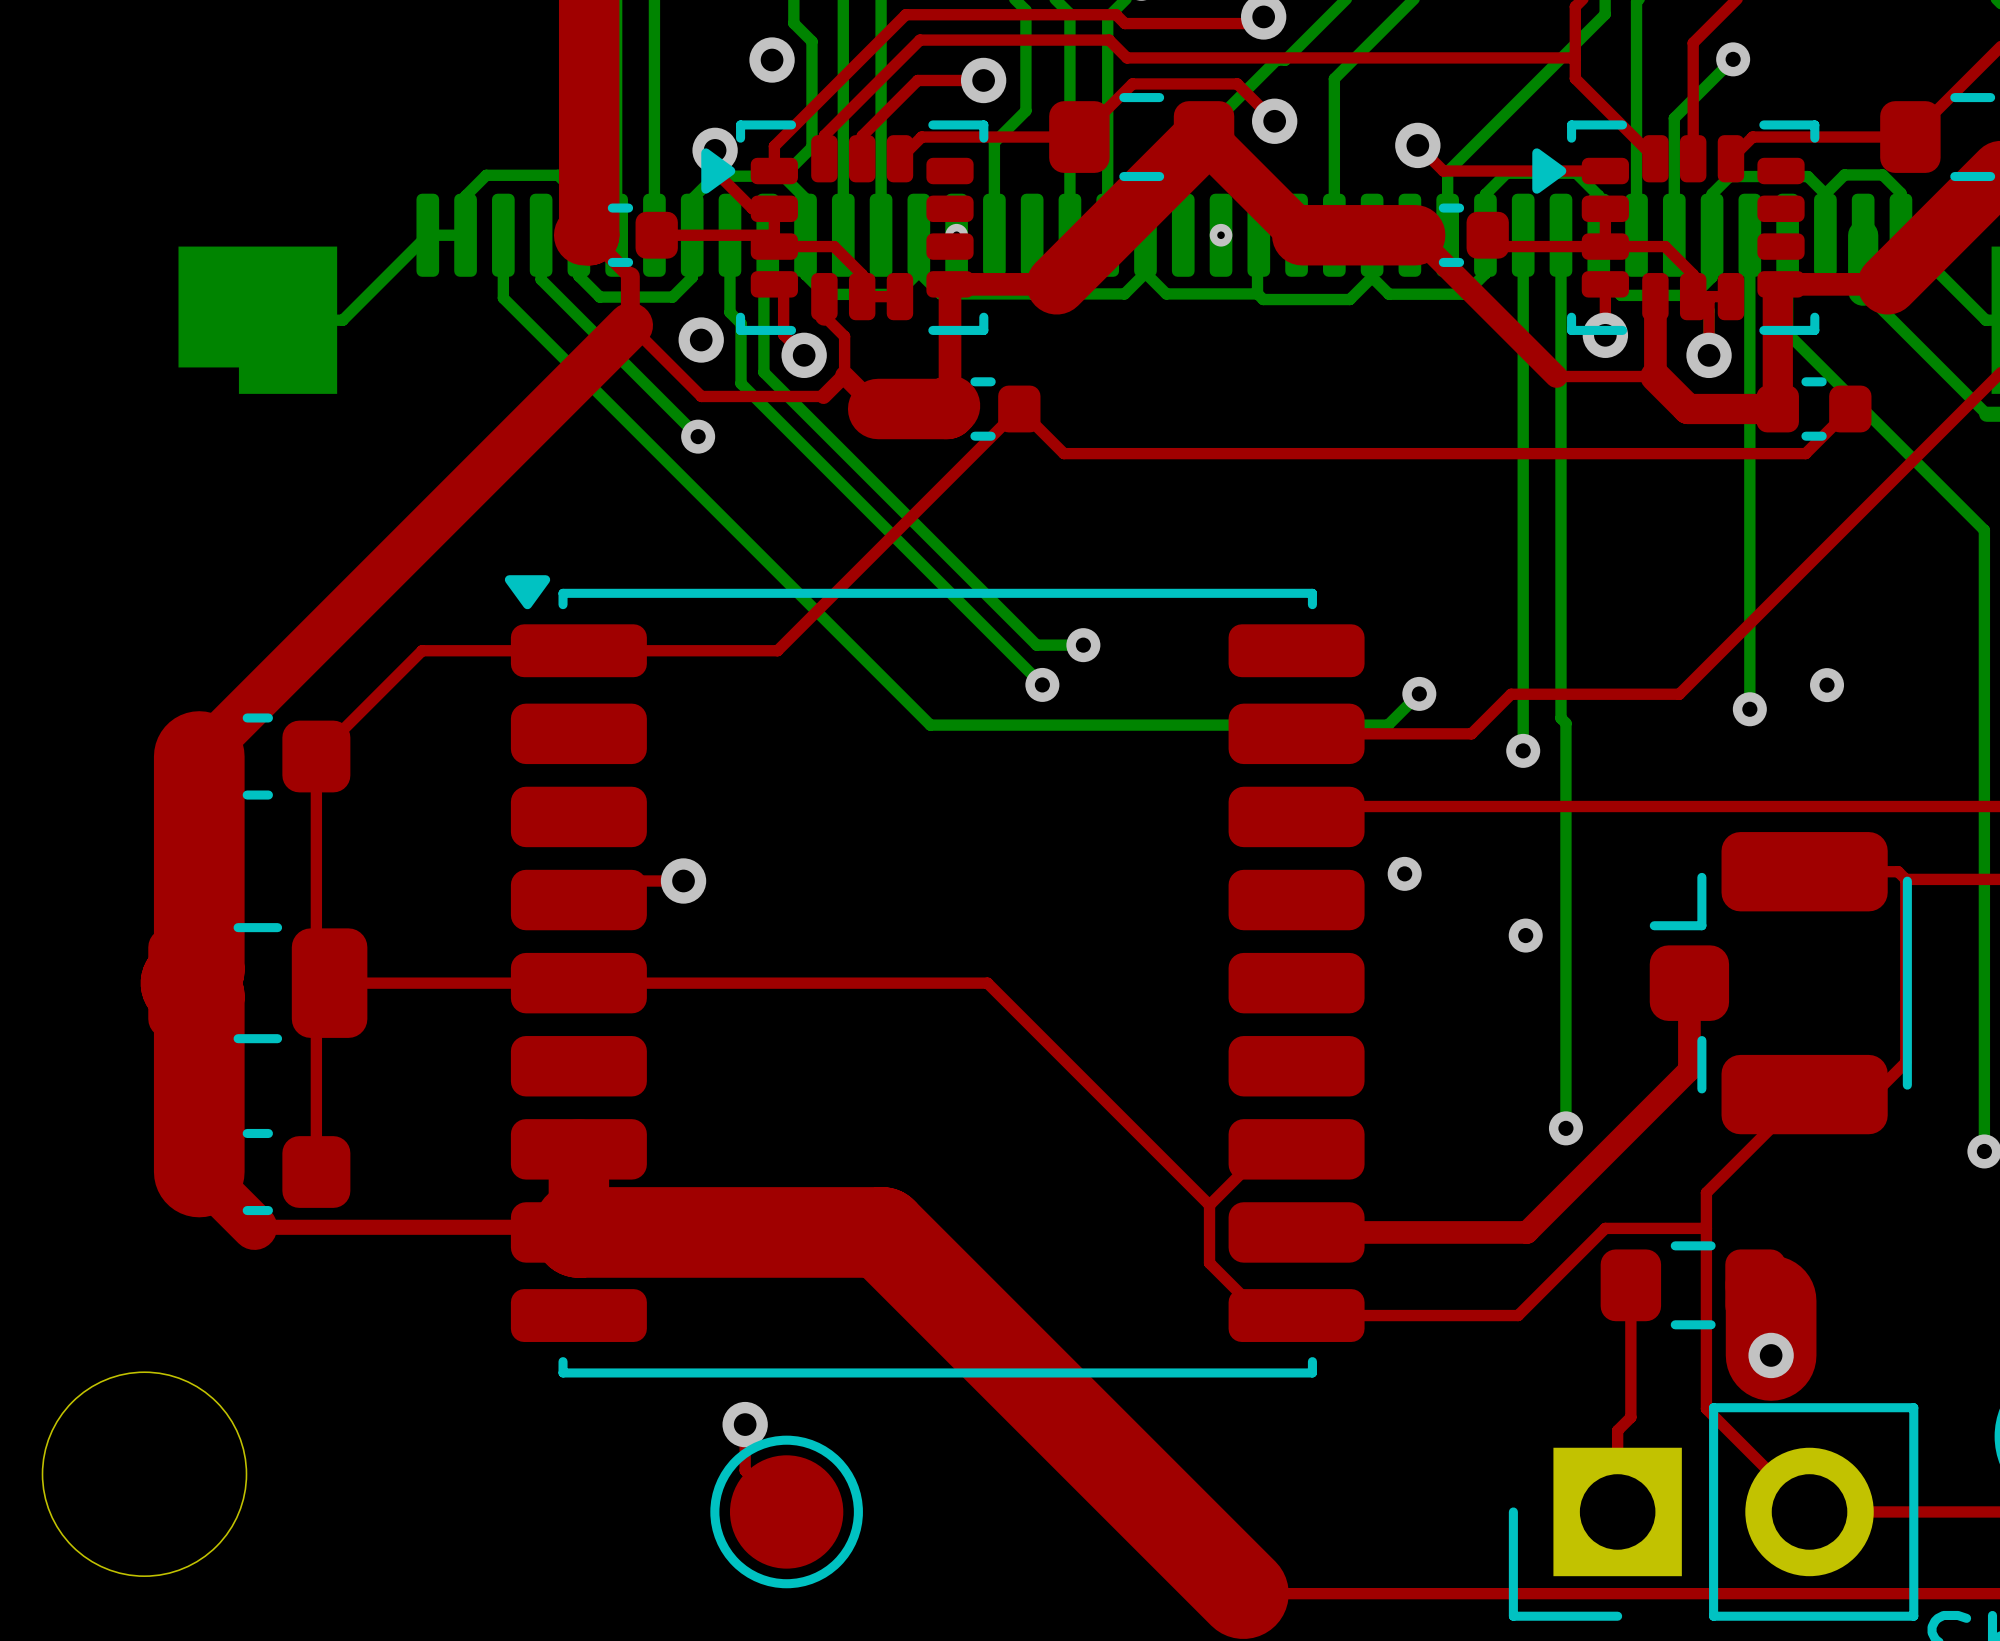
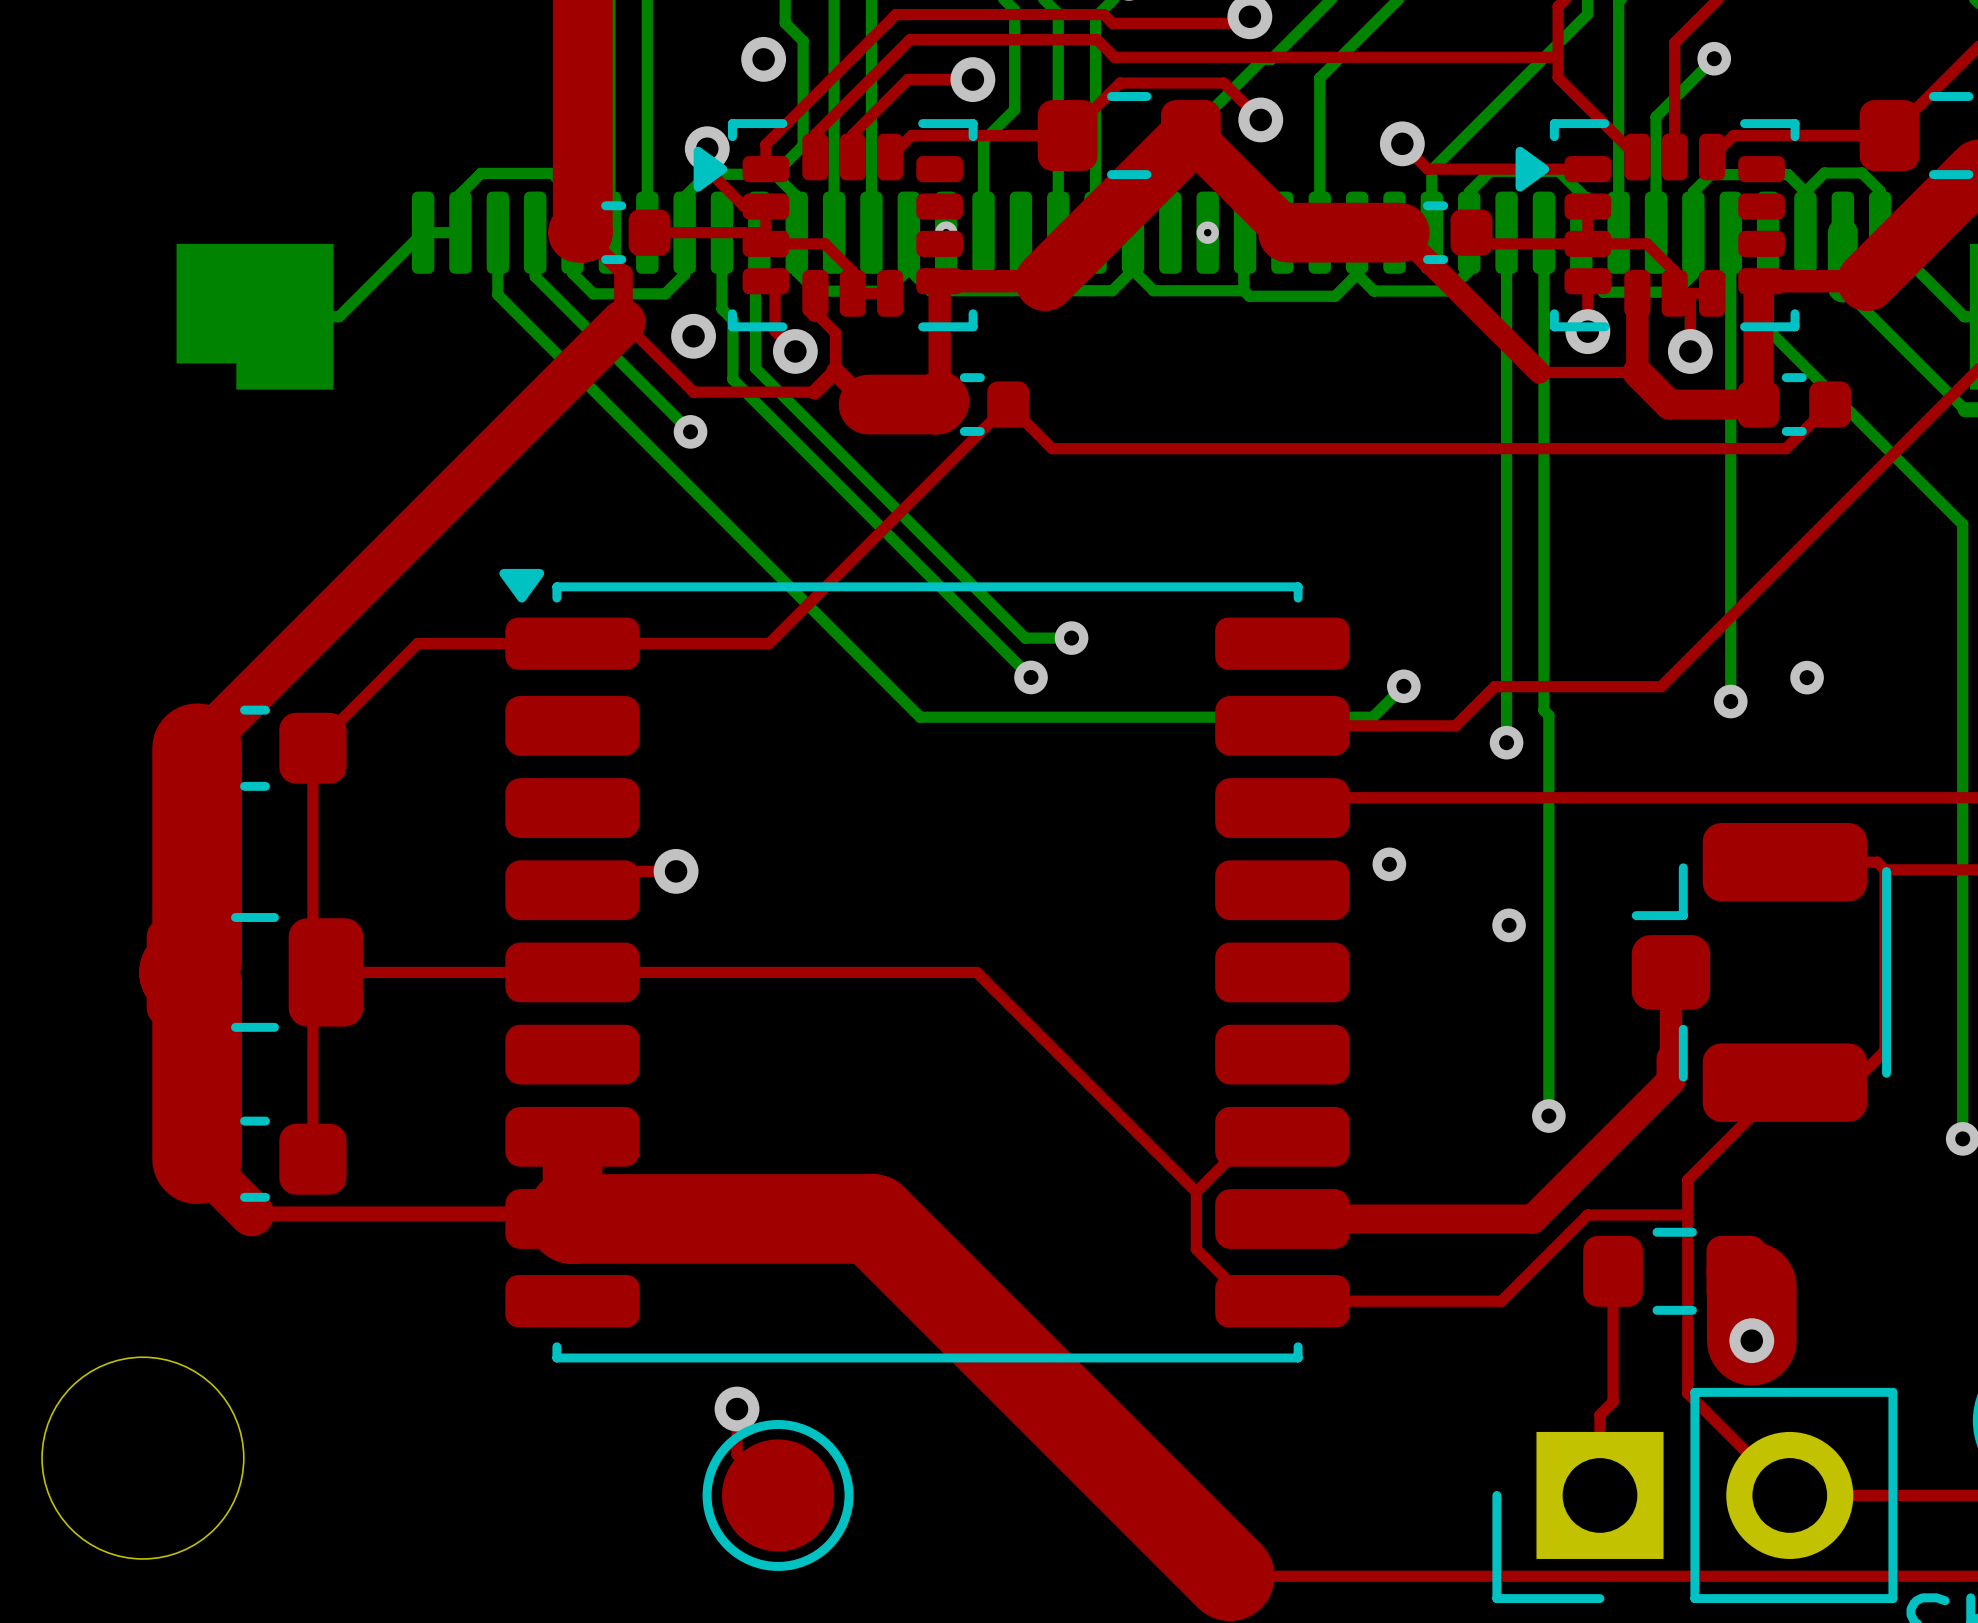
top track: (1689, 1070) (1526, 1232) -> (1670, 1058) (1670, 1080) (1532, 1218) (1510, 1218)
top track width: thin (1296, 1232) (1526, 1232) -> thick (1282, 1218) (1510, 1218)

